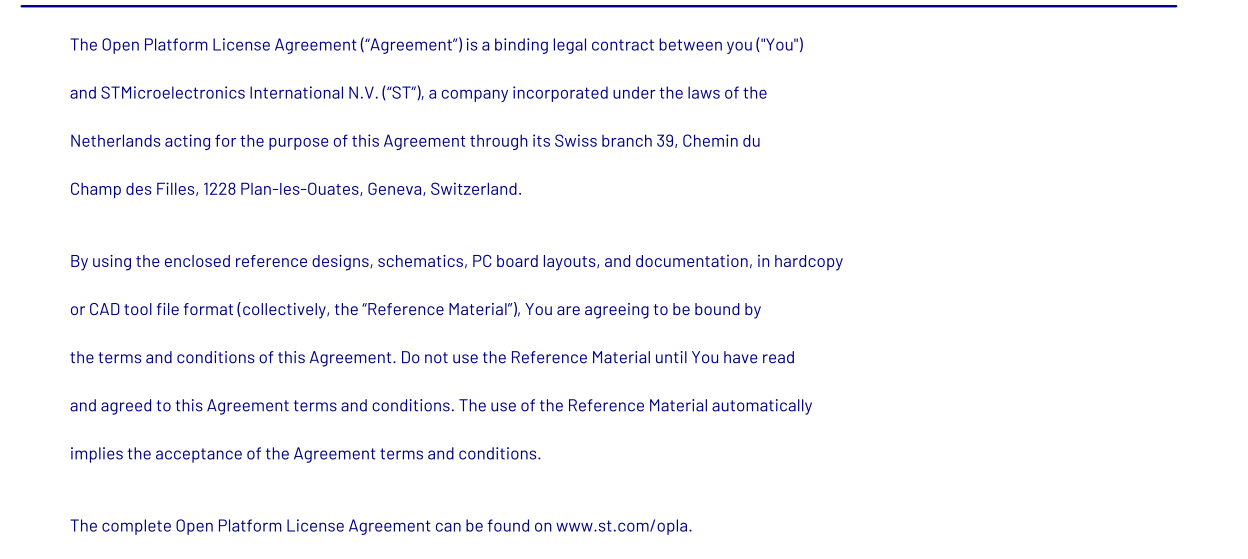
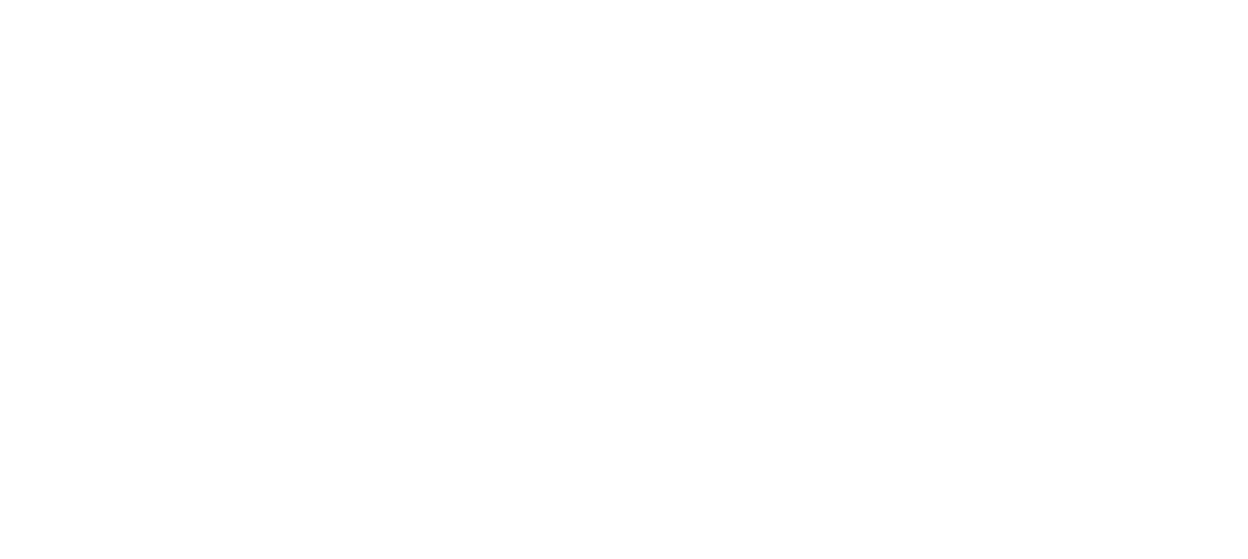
line: (21, 6) (1176, 6) -> none
text: The Open Platform License Agreement (“Agreement”) is a binding legal contract between you ("You") (436, 45) -> none
text: and STMicroelectronics International N.V. (“ST”), a company incorporated under the laws of the (418, 93) -> none
text: Netherlands acting for the purpose of this Agreement through its Swiss branch 39, Chemin du (415, 142) -> none
text: Champ des Filles, 1228 Plan-les-Ouates, Geneva, Switzerland. (296, 190) -> none
text: By using the enclosed reference designs, schematics, PC board layouts, and documentation, in hardcopy (457, 262) -> none
text: or CAD tool file format (collectively, the “Reference Material”), You are agreeing to be bound by (415, 310) -> none
text: the terms and conditions of this Agreement. Do not use the Reference Material until You have read (432, 358) -> none
text: and agreed to this Agreement terms and conditions. The use of the Reference Material automatically (441, 406) -> none
text: implies the acceptance of the Agreement terms and conditions. (305, 454) -> none
text: The complete Open Platform License Agreement can be found on www.st.com/opla. (381, 527) -> none

